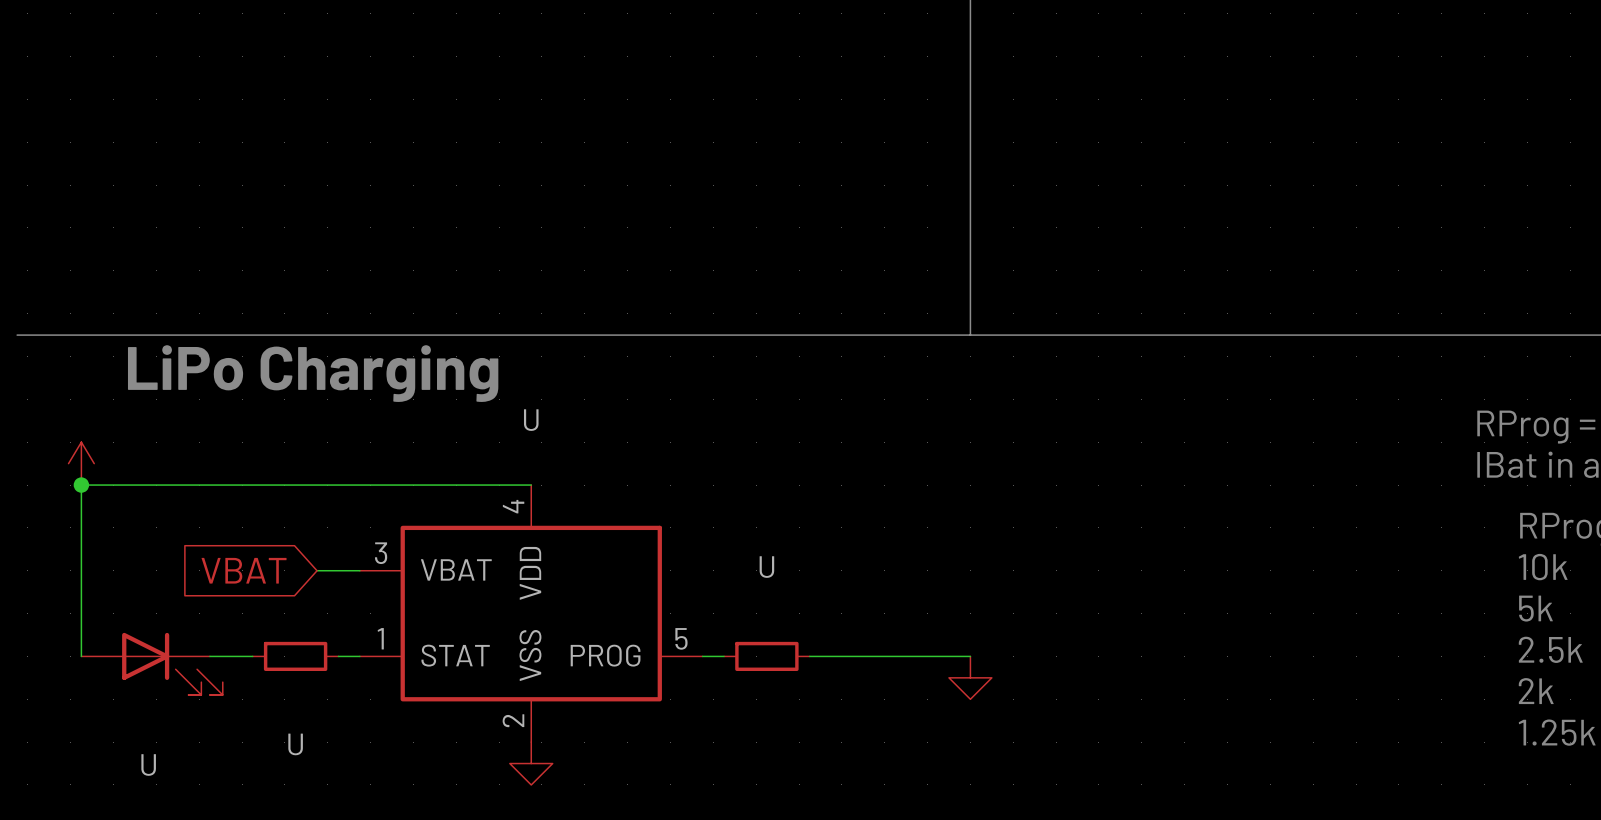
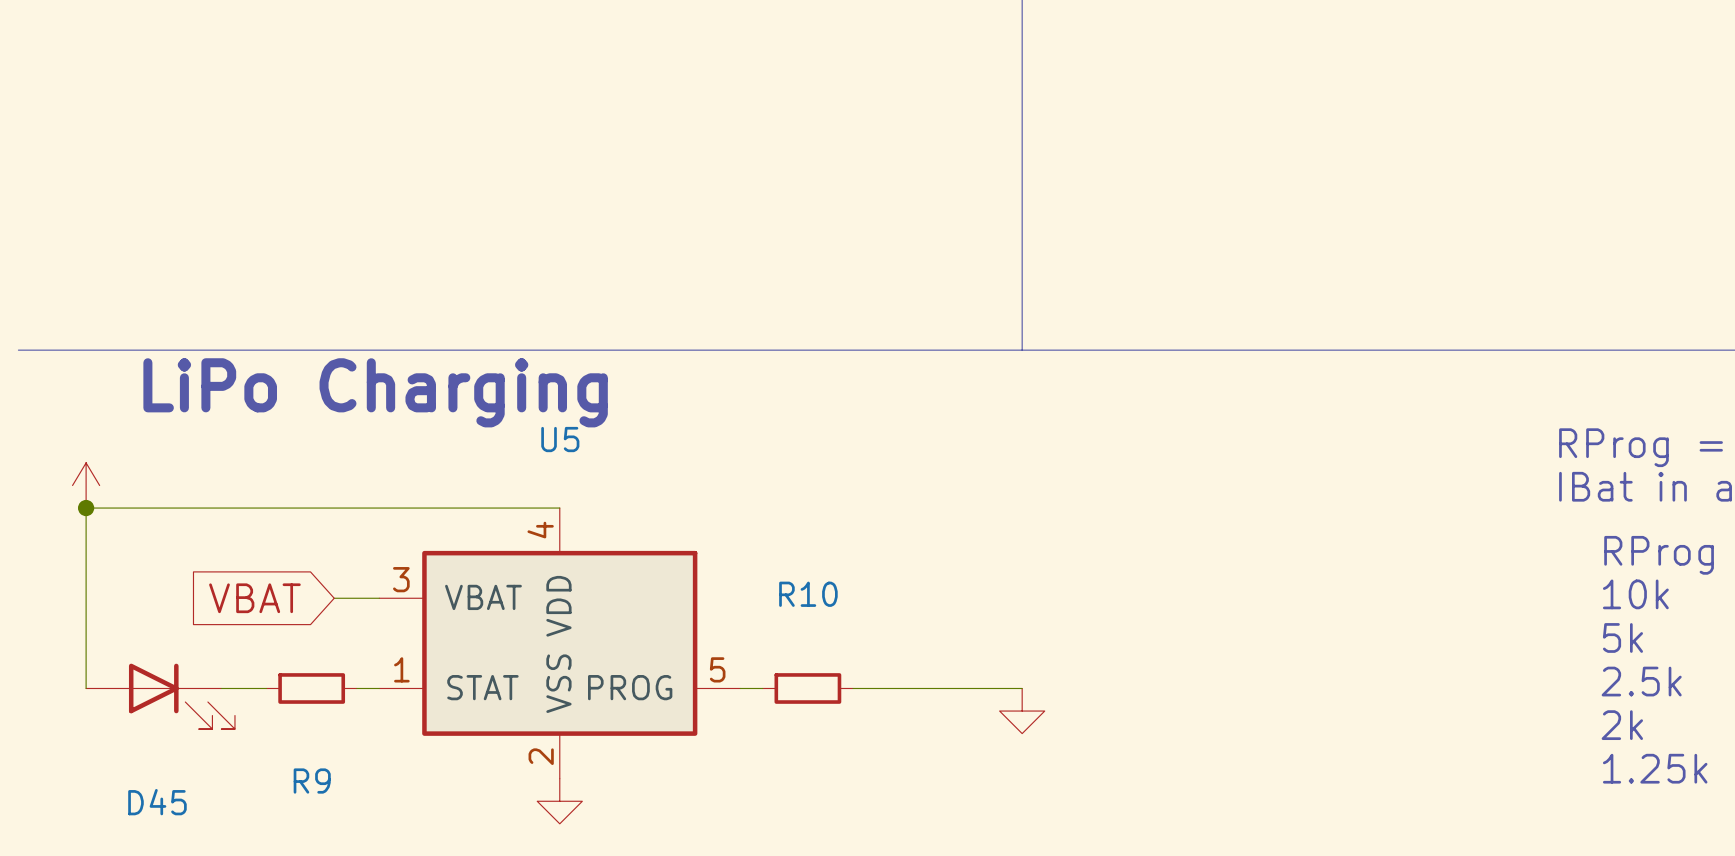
U name: U (531, 420) -> U5 (560, 439)
U name: U (766, 567) -> R10 (808, 594)
U name: U (295, 744) -> R9 (312, 781)
U name: U (148, 765) -> D45 (157, 802)

